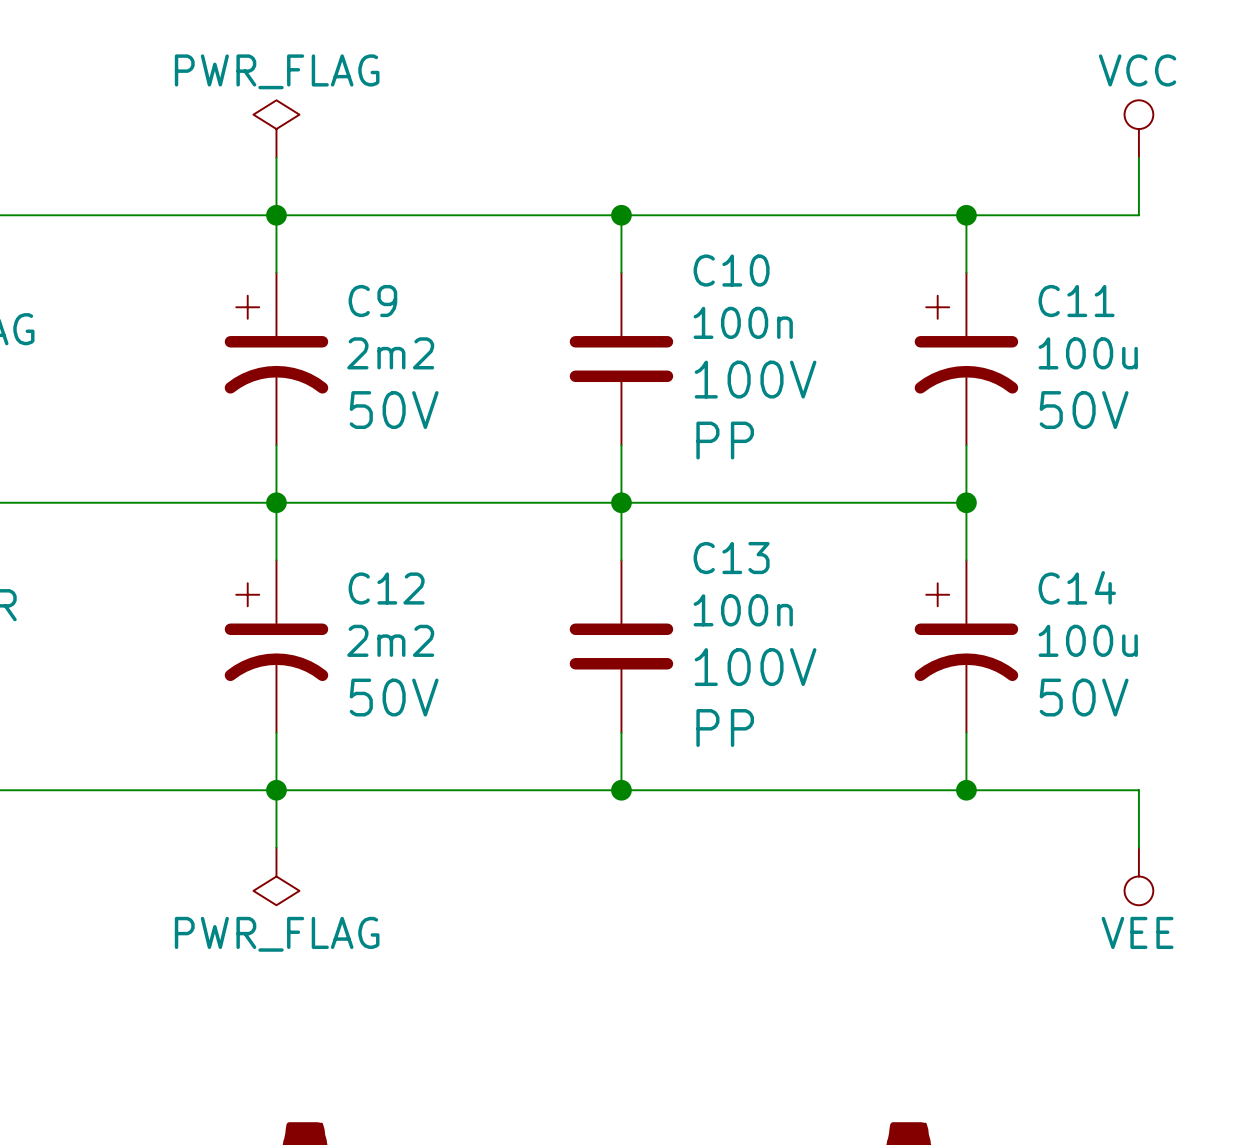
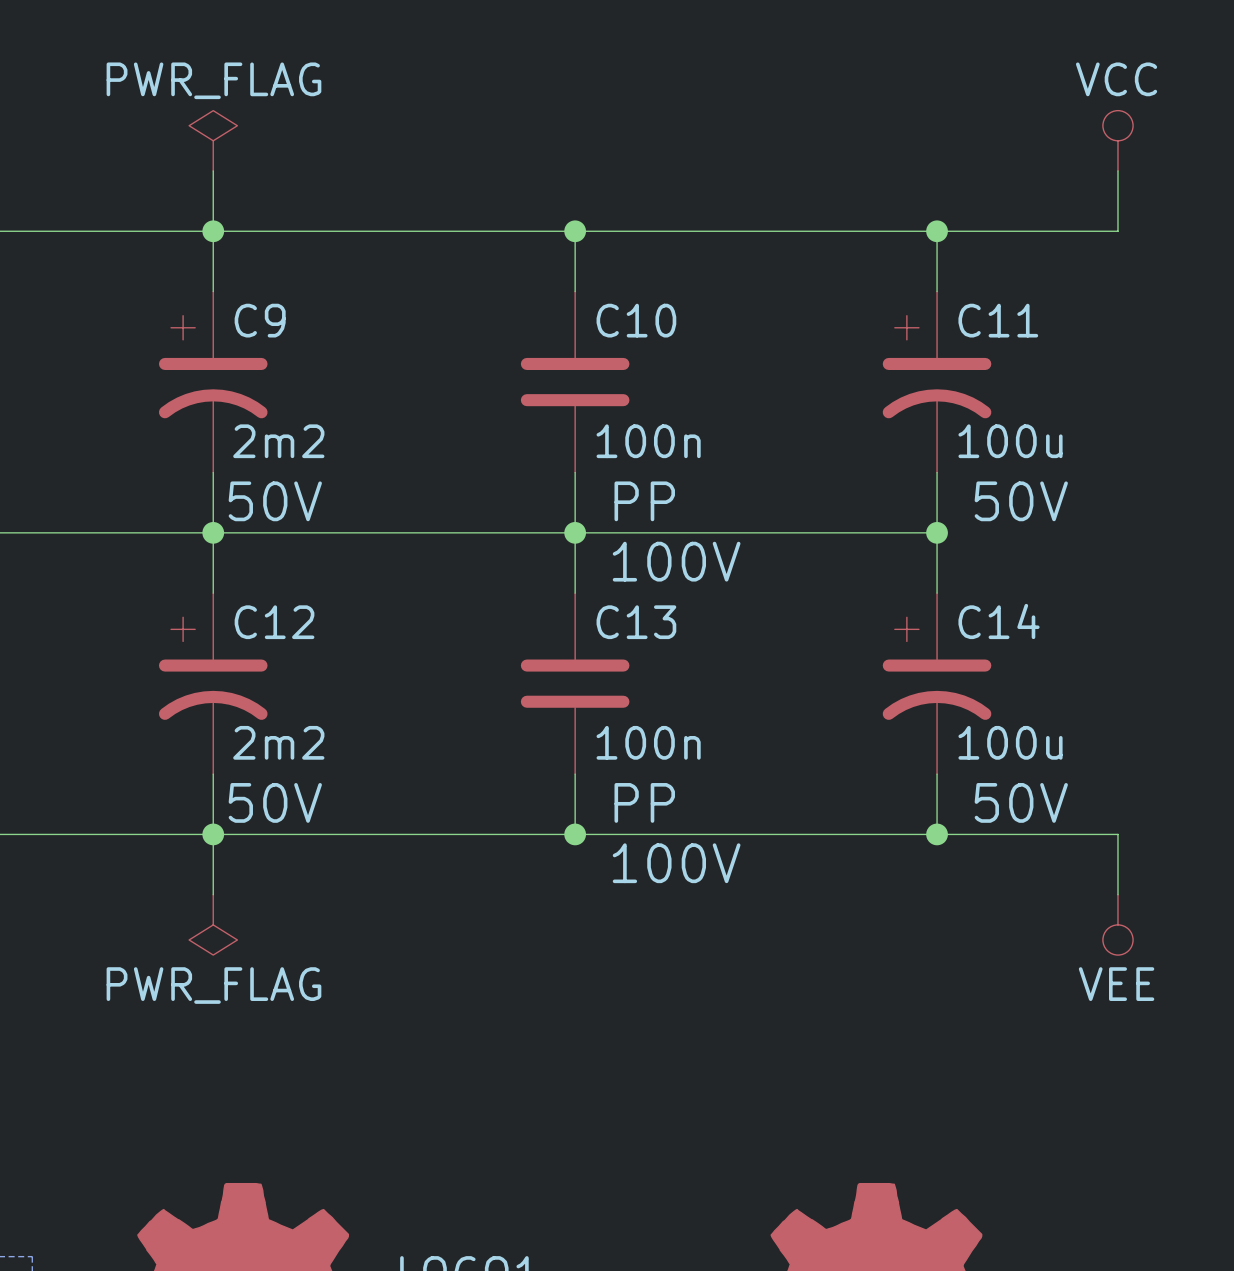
C10 name position: C10 (731, 270) -> C10 (636, 320)
C9 name position: C9 (372, 301) -> C9 (260, 320)
C11 name position: C11 (1076, 301) -> C11 (998, 320)
C10 value position: 100n (743, 322) -> 100n (648, 441)
C9 value position: 2m2 (390, 353) -> 2m2 (278, 441)
C11 value position: 100u (1088, 353) -> 100u (1010, 441)
C10 text position: 100V (755, 379) -> 100V (676, 561)
C9 text position: 50V (394, 410) -> 50V (275, 501)
C11 text position: 50V (1084, 410) -> 50V (1021, 501)
C10 text position: PP (725, 440) -> PP (644, 501)
C13 name position: C13 (731, 558) -> C13 (636, 622)
C14 name position: C14 (1077, 587) -> C14 (999, 621)
C12 name position: C12 (386, 588) -> C12 (274, 622)
C13 value position: 100n (743, 610) -> 100n (648, 742)
C12 value position: 2m2 (390, 640) -> 2m2 (278, 742)
C14 value position: 100u (1088, 640) -> 100u (1010, 742)
C13 text position: 100V (755, 667) -> 100V (676, 863)
C12 text position: 50V (394, 697) -> 50V (275, 802)
C14 text position: 50V (1084, 697) -> 50V (1021, 802)
C13 text position: PP (725, 728) -> PP (644, 802)

